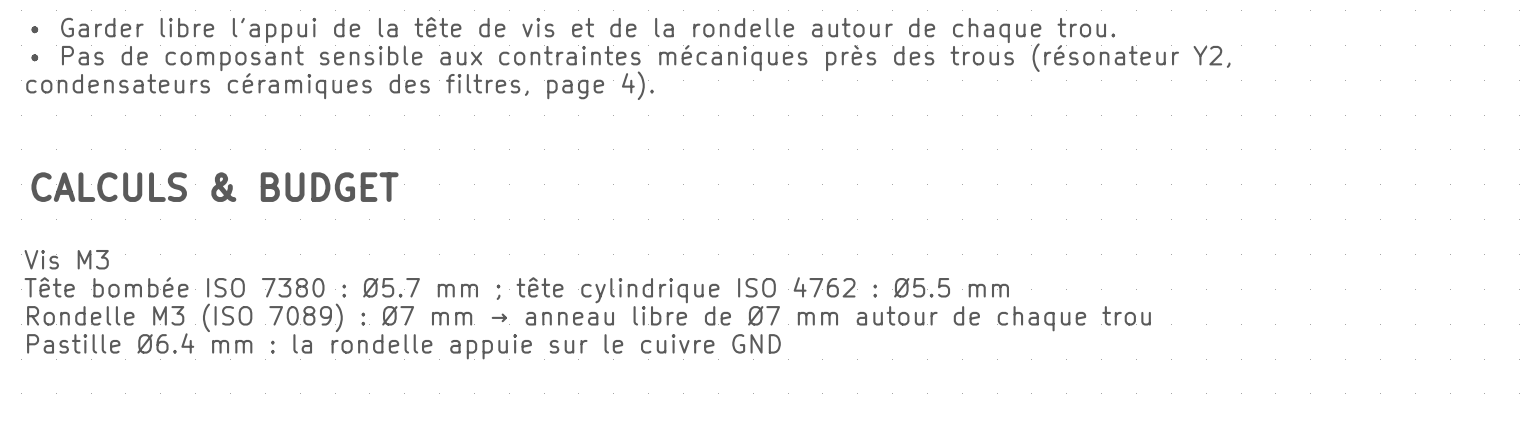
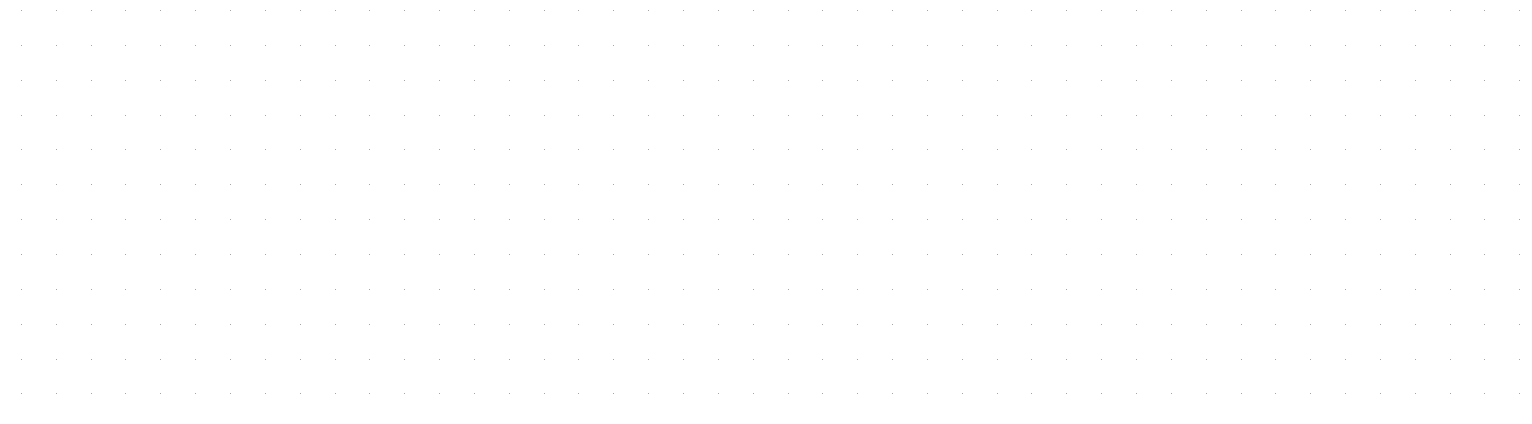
text: • Garder libre l'appui de la tête de vis et de la rondelle autour de chaque trou. (573, 30) -> none
text: • Pas de composant sensible aux contraintes mécaniques près des trous (résonateur Y2, (630, 57) -> none
text: condensateurs céramiques des filtres, page 4). (340, 85) -> none
text: CALCULS & BUDGET (215, 187) -> none
text: Vis M3 (66, 259) -> none
text: Tête bombée ISO 7380 : Ø5.7 mm ; tête cylindrique ISO 4762 : Ø5.5 mm (516, 290) -> none
text: Rondelle M3 (ISO 7089) : Ø7 mm → anneau libre de Ø7 mm autour de chaque trou (588, 317) -> none
text: Pastille Ø6.4 mm : la rondelle appuie sur le cuivre GND (403, 346) -> none

